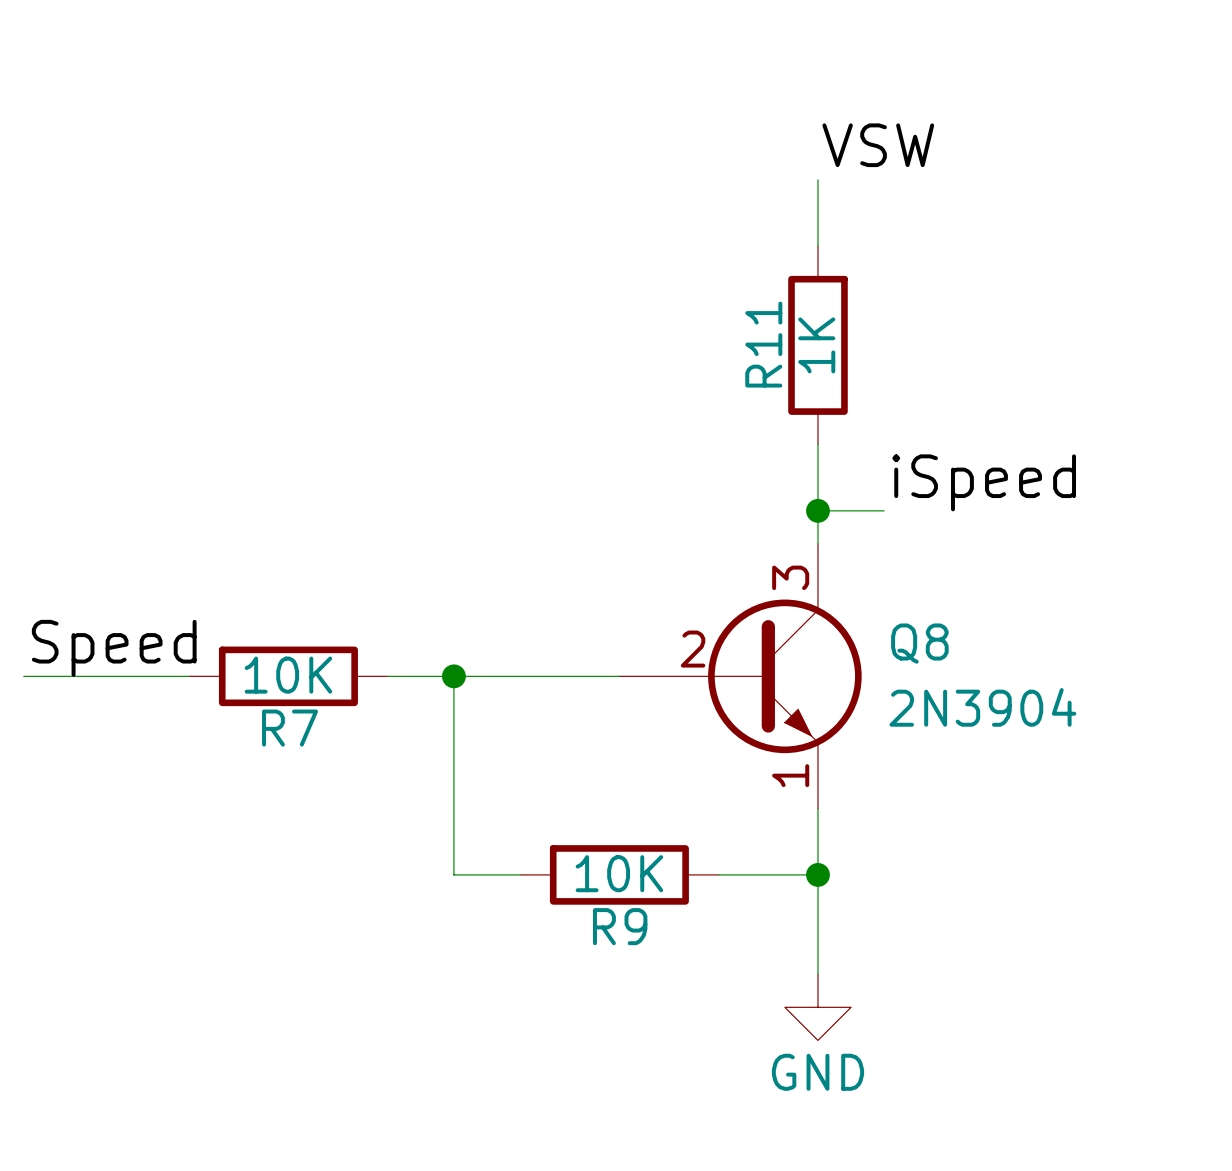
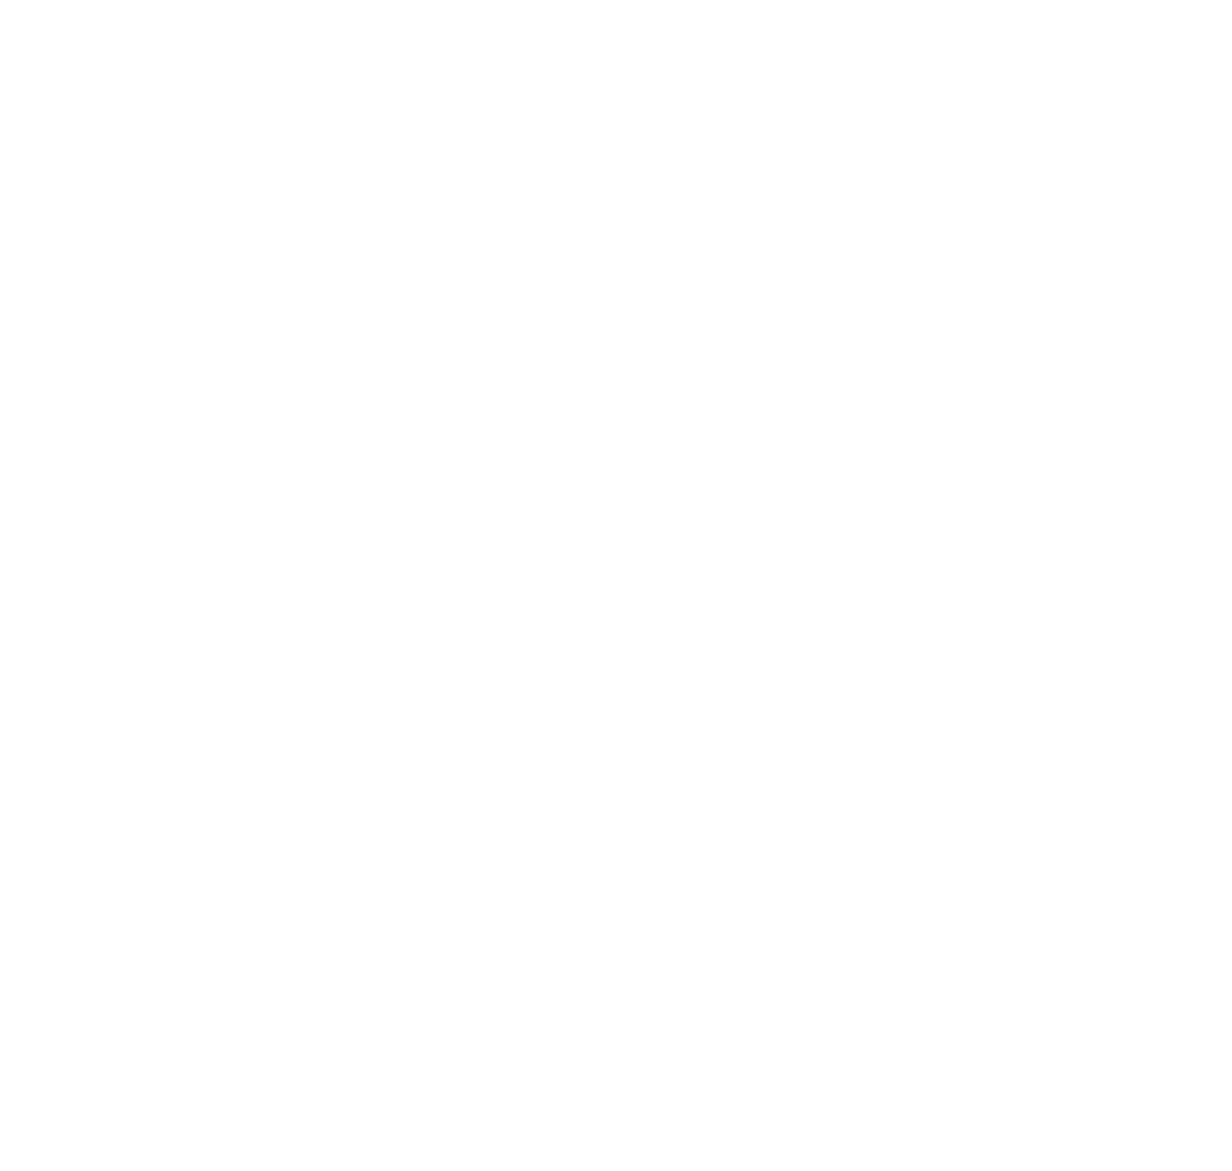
label: VSW (878, 145) -> none
wire: (817, 179) (817, 246) -> none
R11: 1K (817, 345) -> none
wire: (817, 444) (817, 543) -> none
label: iSpeed (984, 482) -> none
wire: (817, 510) (884, 510) -> none
junction: (817, 510) -> none
label: Speed (114, 648) -> none
wire: (23, 676) (189, 676) -> none
R7: 10K (288, 676) -> none
wire: (387, 676) (619, 676) -> none
wire: (453, 676) (453, 874) (520, 874) -> none
junction: (453, 676) -> none
Q8: 2N3904 (740, 676) -> none
wire: (817, 808) (817, 974) -> none
R9: 10K (619, 874) -> none
wire: (718, 874) (817, 874) -> none
junction: (817, 874) -> none
power symbol: GND (817, 1007) -> none

